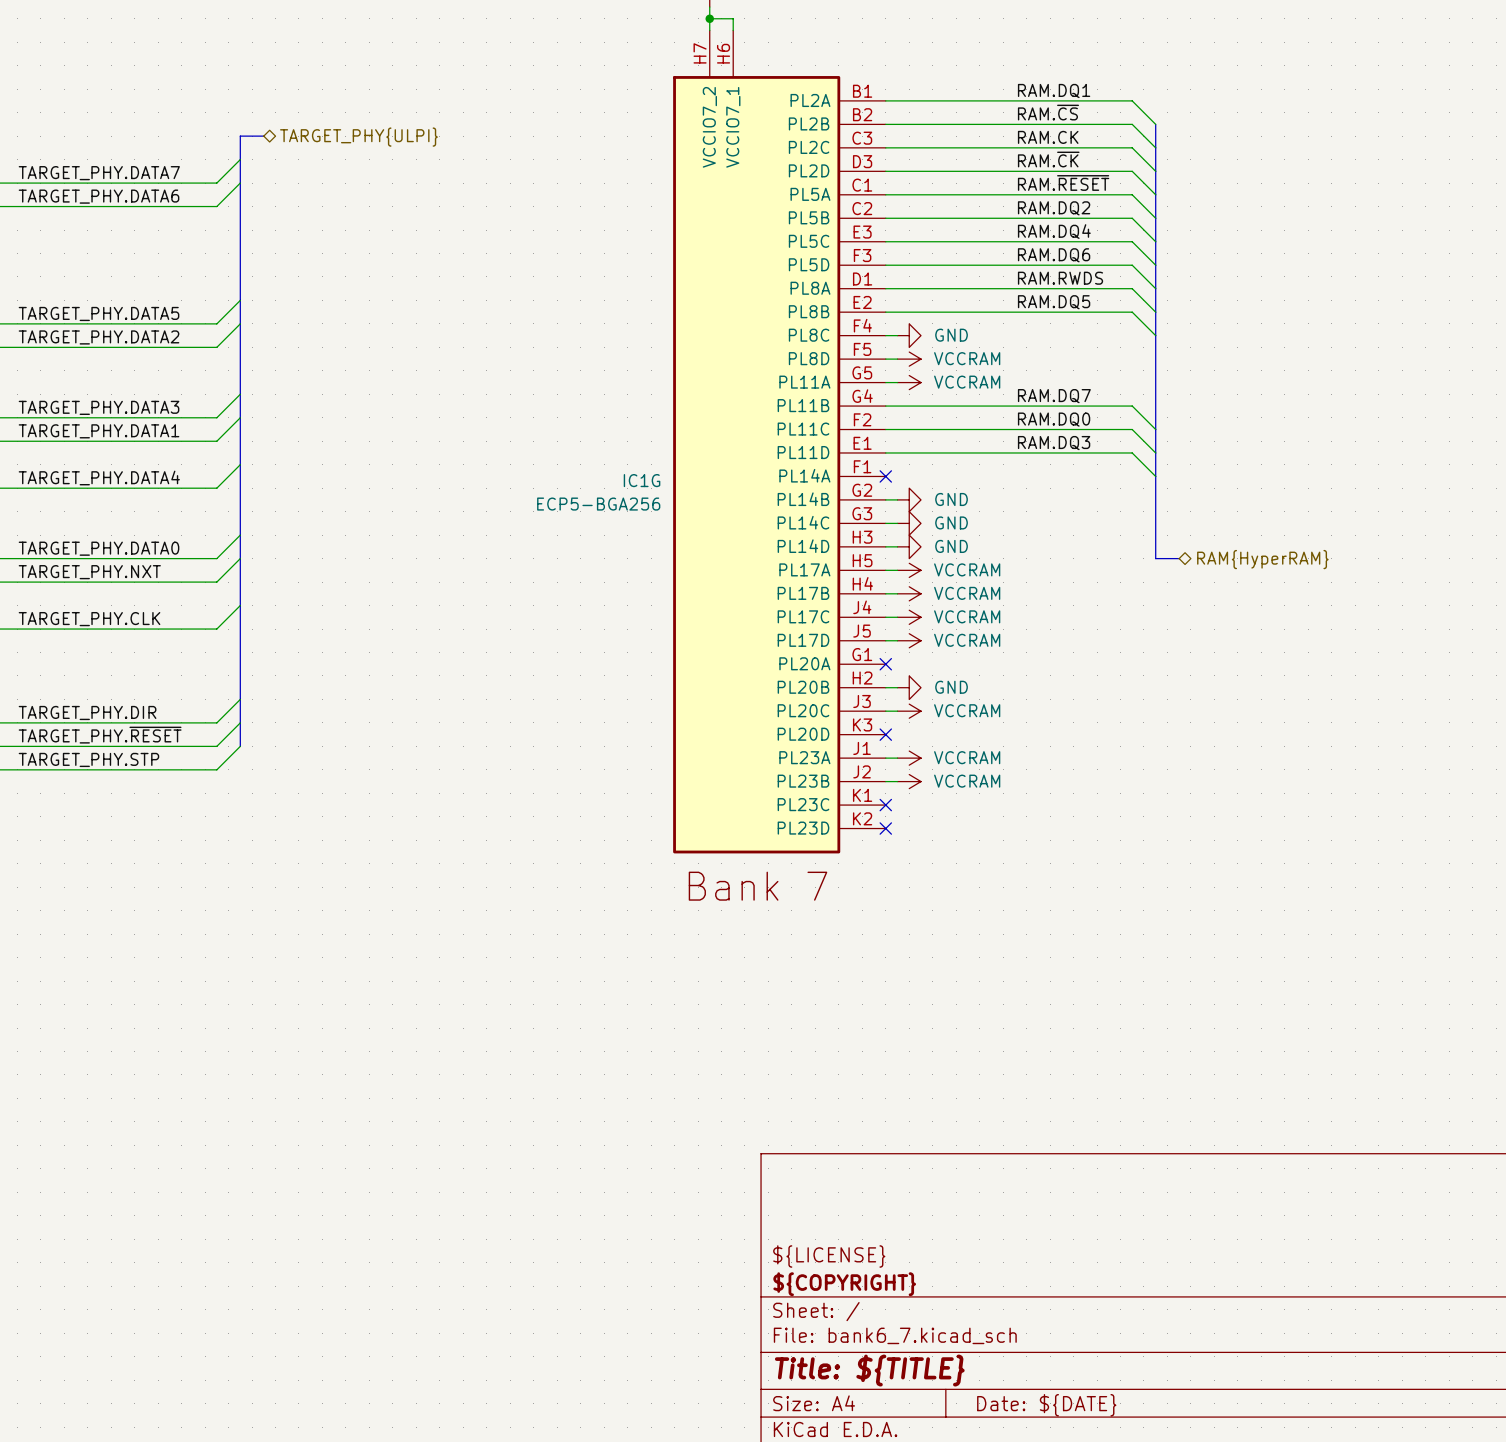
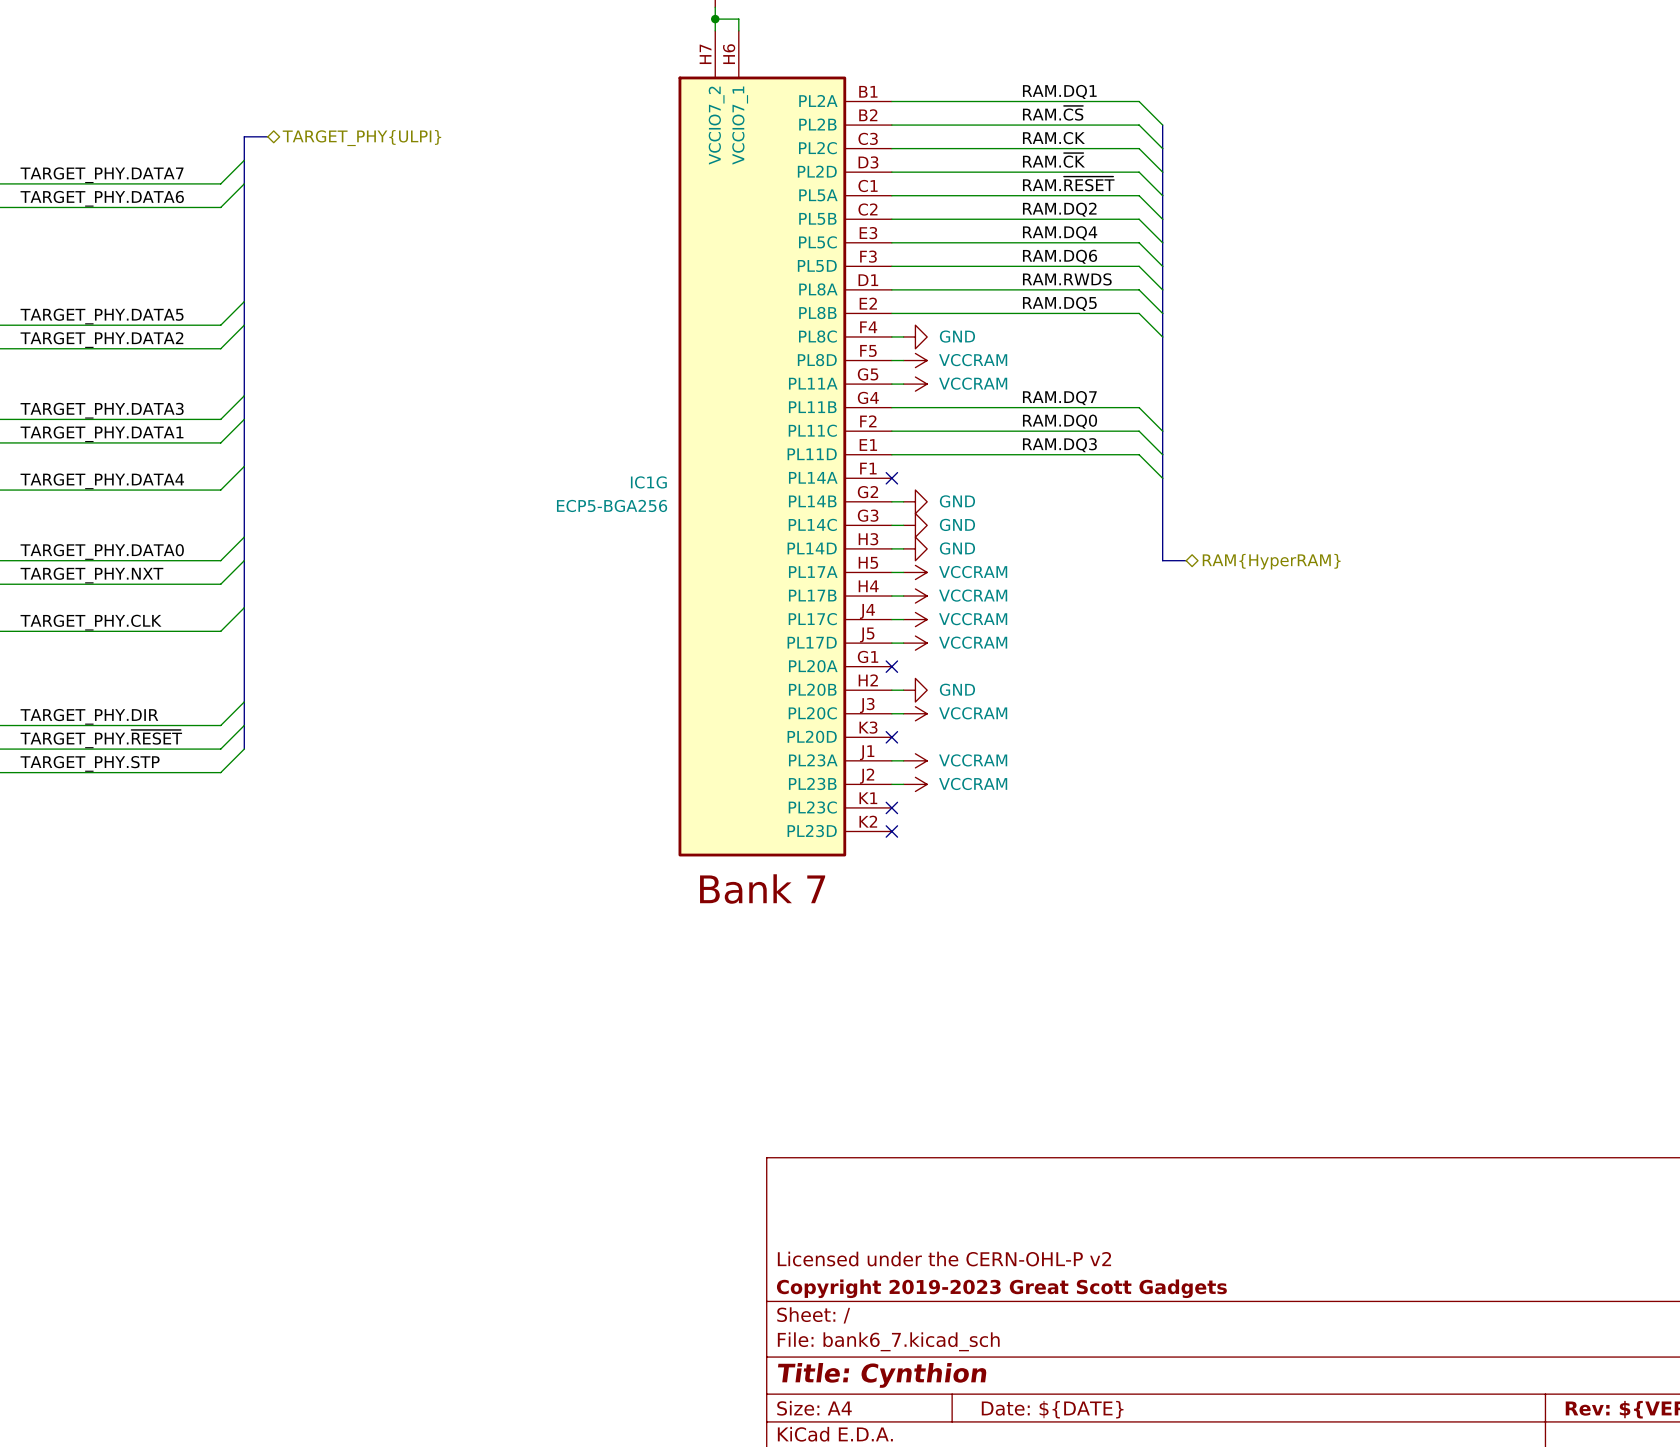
title block: ${LICENSE} (829, 1256) -> Licensed under the CERN-OHL-P v2 (944, 1259)
title block: ${COPYRIGHT} (844, 1284) -> Copyright 2019-2023 Great Scott Gadgets (1001, 1288)
title block: Title: ${TITLE} (869, 1370) -> Title: Cynthion (882, 1375)

